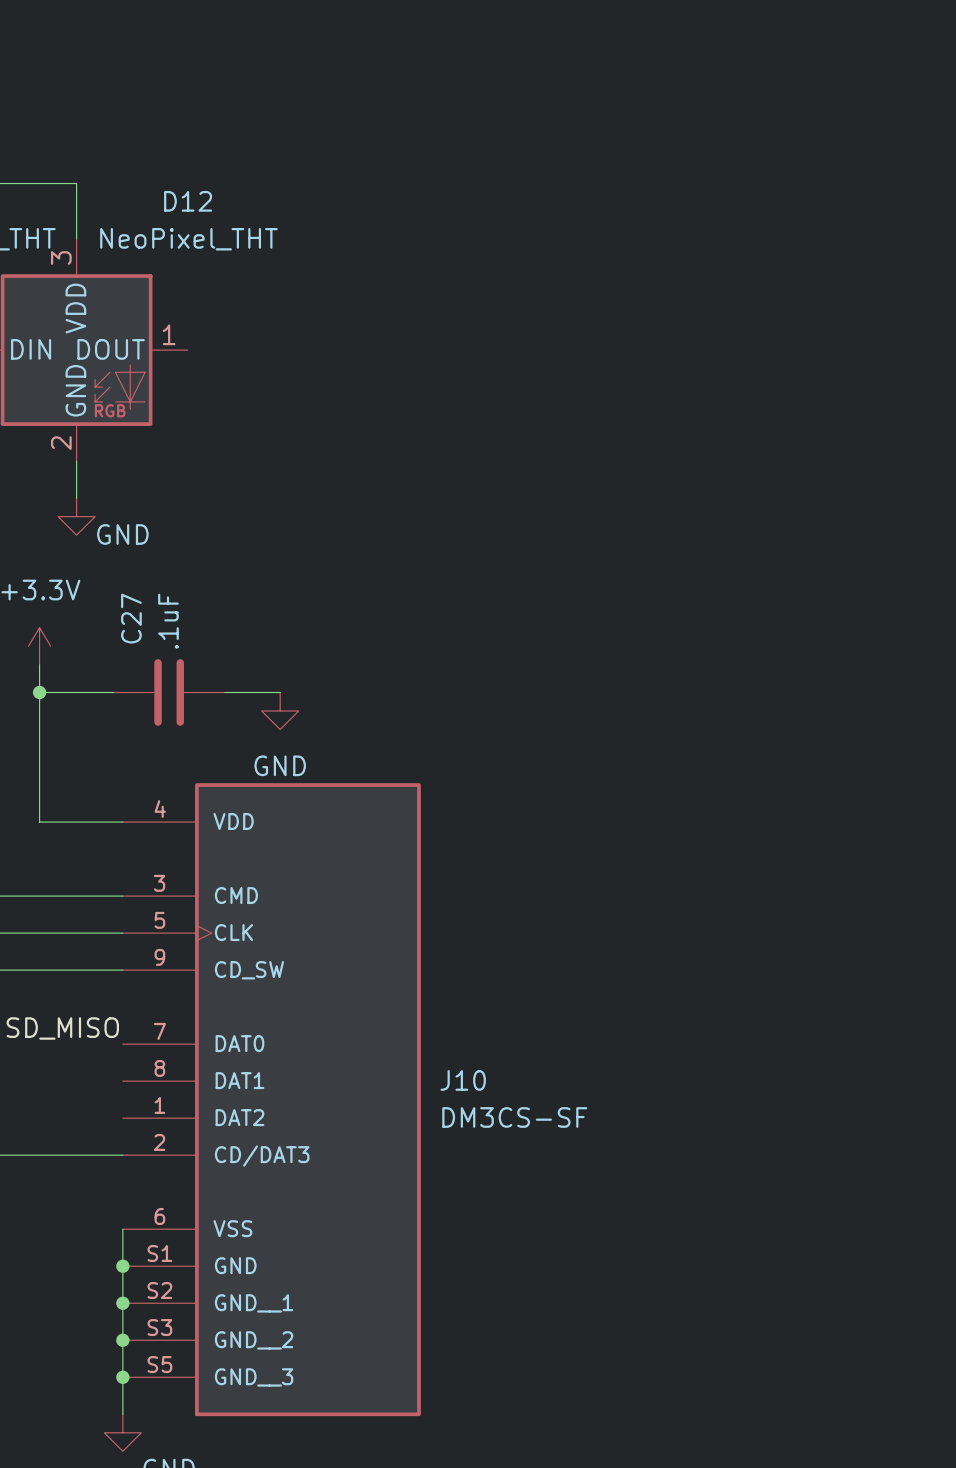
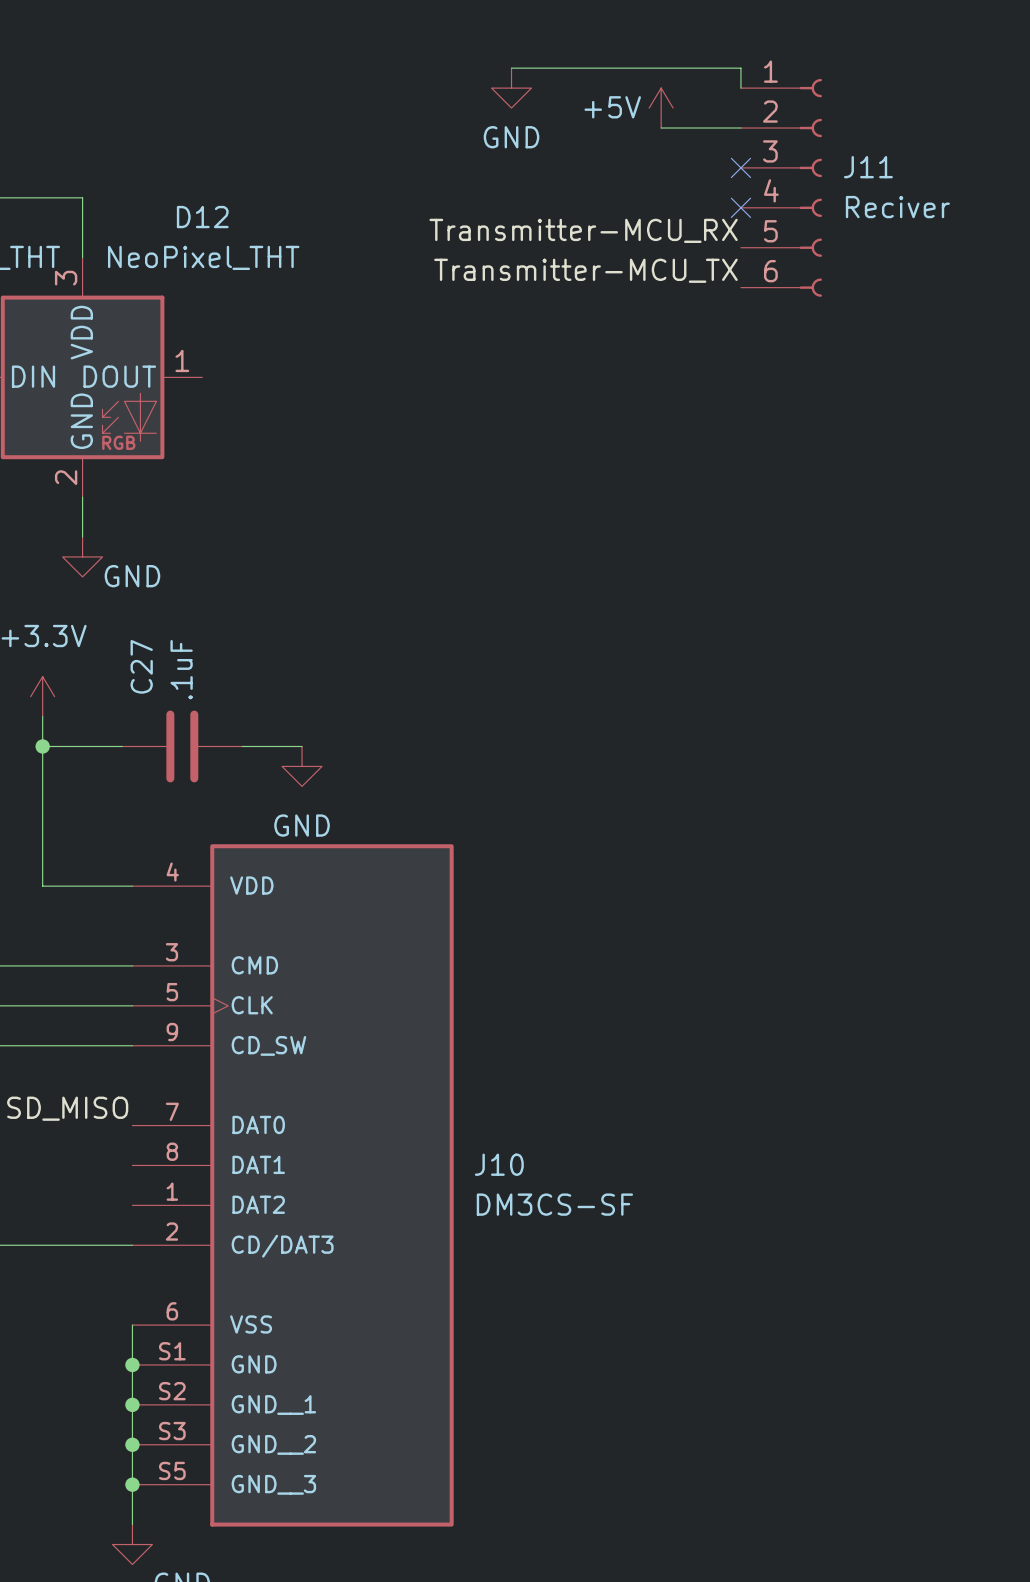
wire: none -> (511, 68) (740, 68) (740, 88)
power symbol: none -> GND (511, 88)
power symbol: none -> +5V (661, 108)
wire: none -> (661, 128) (740, 128)
no-connect mark: none -> (740, 167)
J11: none -> Reciver (781, 187)
no-connect mark: none -> (740, 207)
label: none -> Transmitter-MCU_RX (583, 230)
label: none -> Transmitter-MCU_TX (585, 270)

